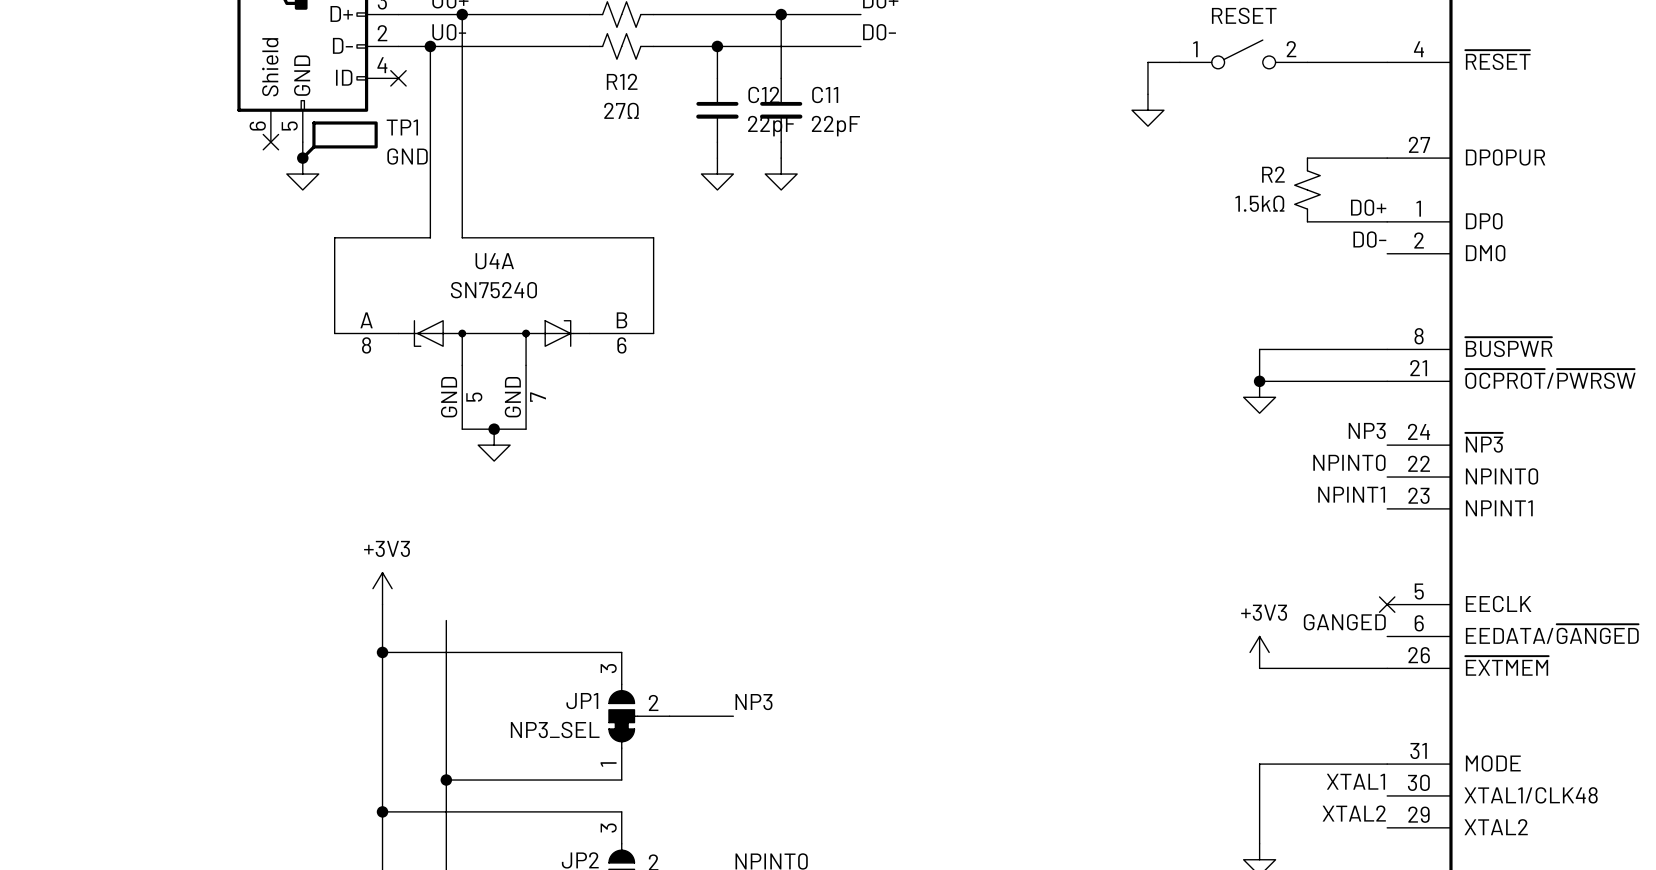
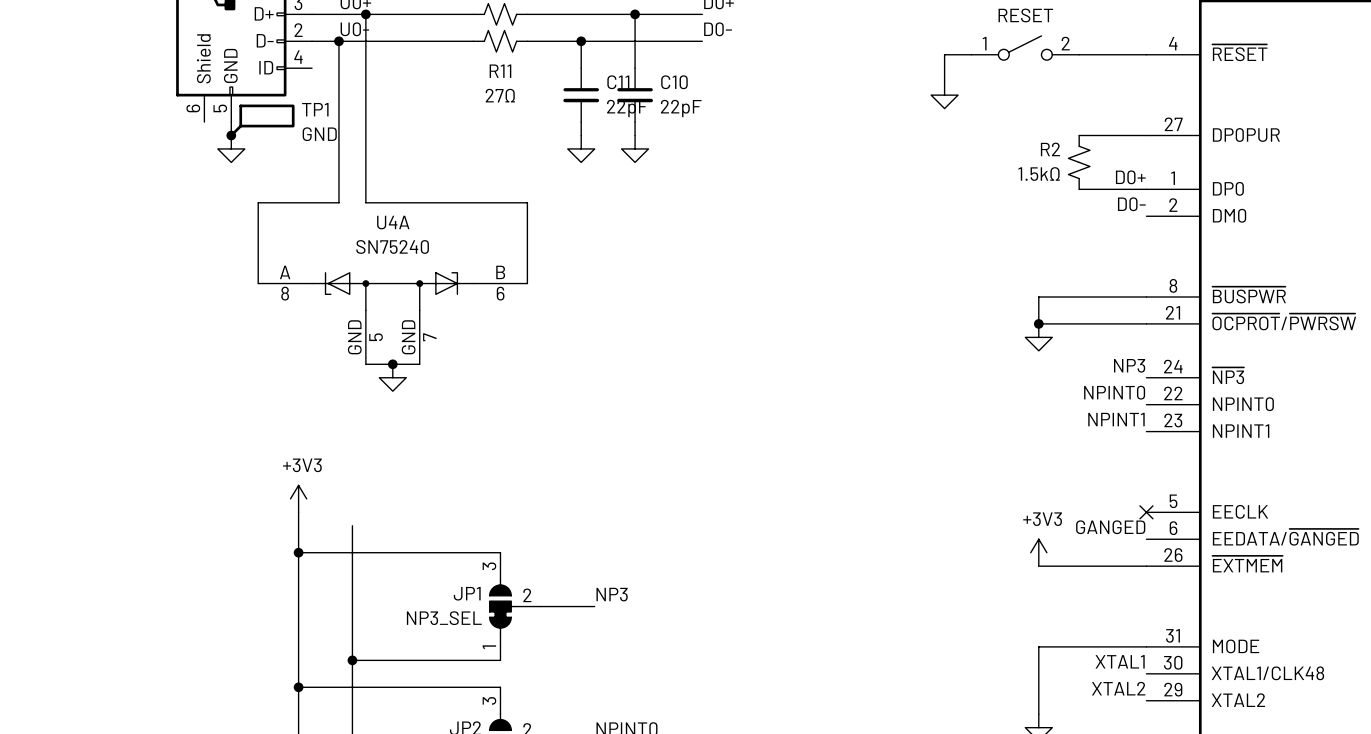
no-connect mark: (398, 78) -> none
R12 name: R12 (622, 81) -> R11 (500, 71)
C12 name: C12 (763, 94) -> C11 (618, 82)
C11 name: C11 (825, 94) -> C10 (674, 82)
no-connect mark: (270, 142) -> none

